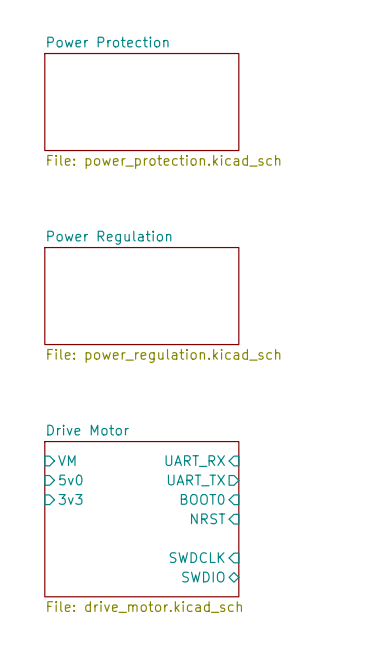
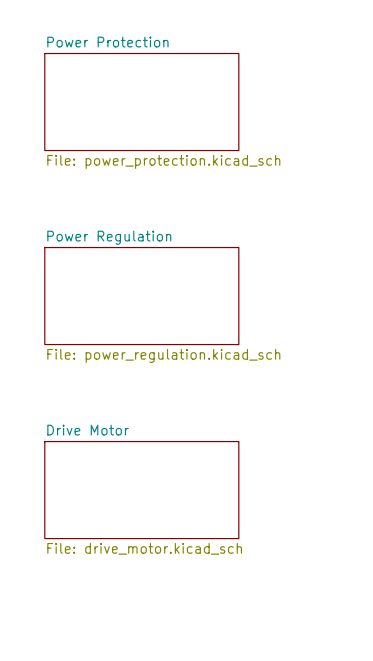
sheet pin: VM (66, 460) -> none
sheet pin: UART_RX (195, 461) -> none
sheet pin: 5v0 (70, 480) -> none
sheet pin: UART_TX (196, 480) -> none
sheet Drive Motor: none -> File: drive_motor.kicad_sch (141, 490)
sheet pin: 3v3 (70, 499) -> none
sheet pin: BOOT0 (202, 499) -> none
sheet pin: NRST (208, 518) -> none
sheet Drive Motor: File: drive_motor.kicad_sch (141, 519) -> none
sheet pin: SWDCLK (197, 557) -> none
sheet pin: SWDIO (203, 577) -> none

